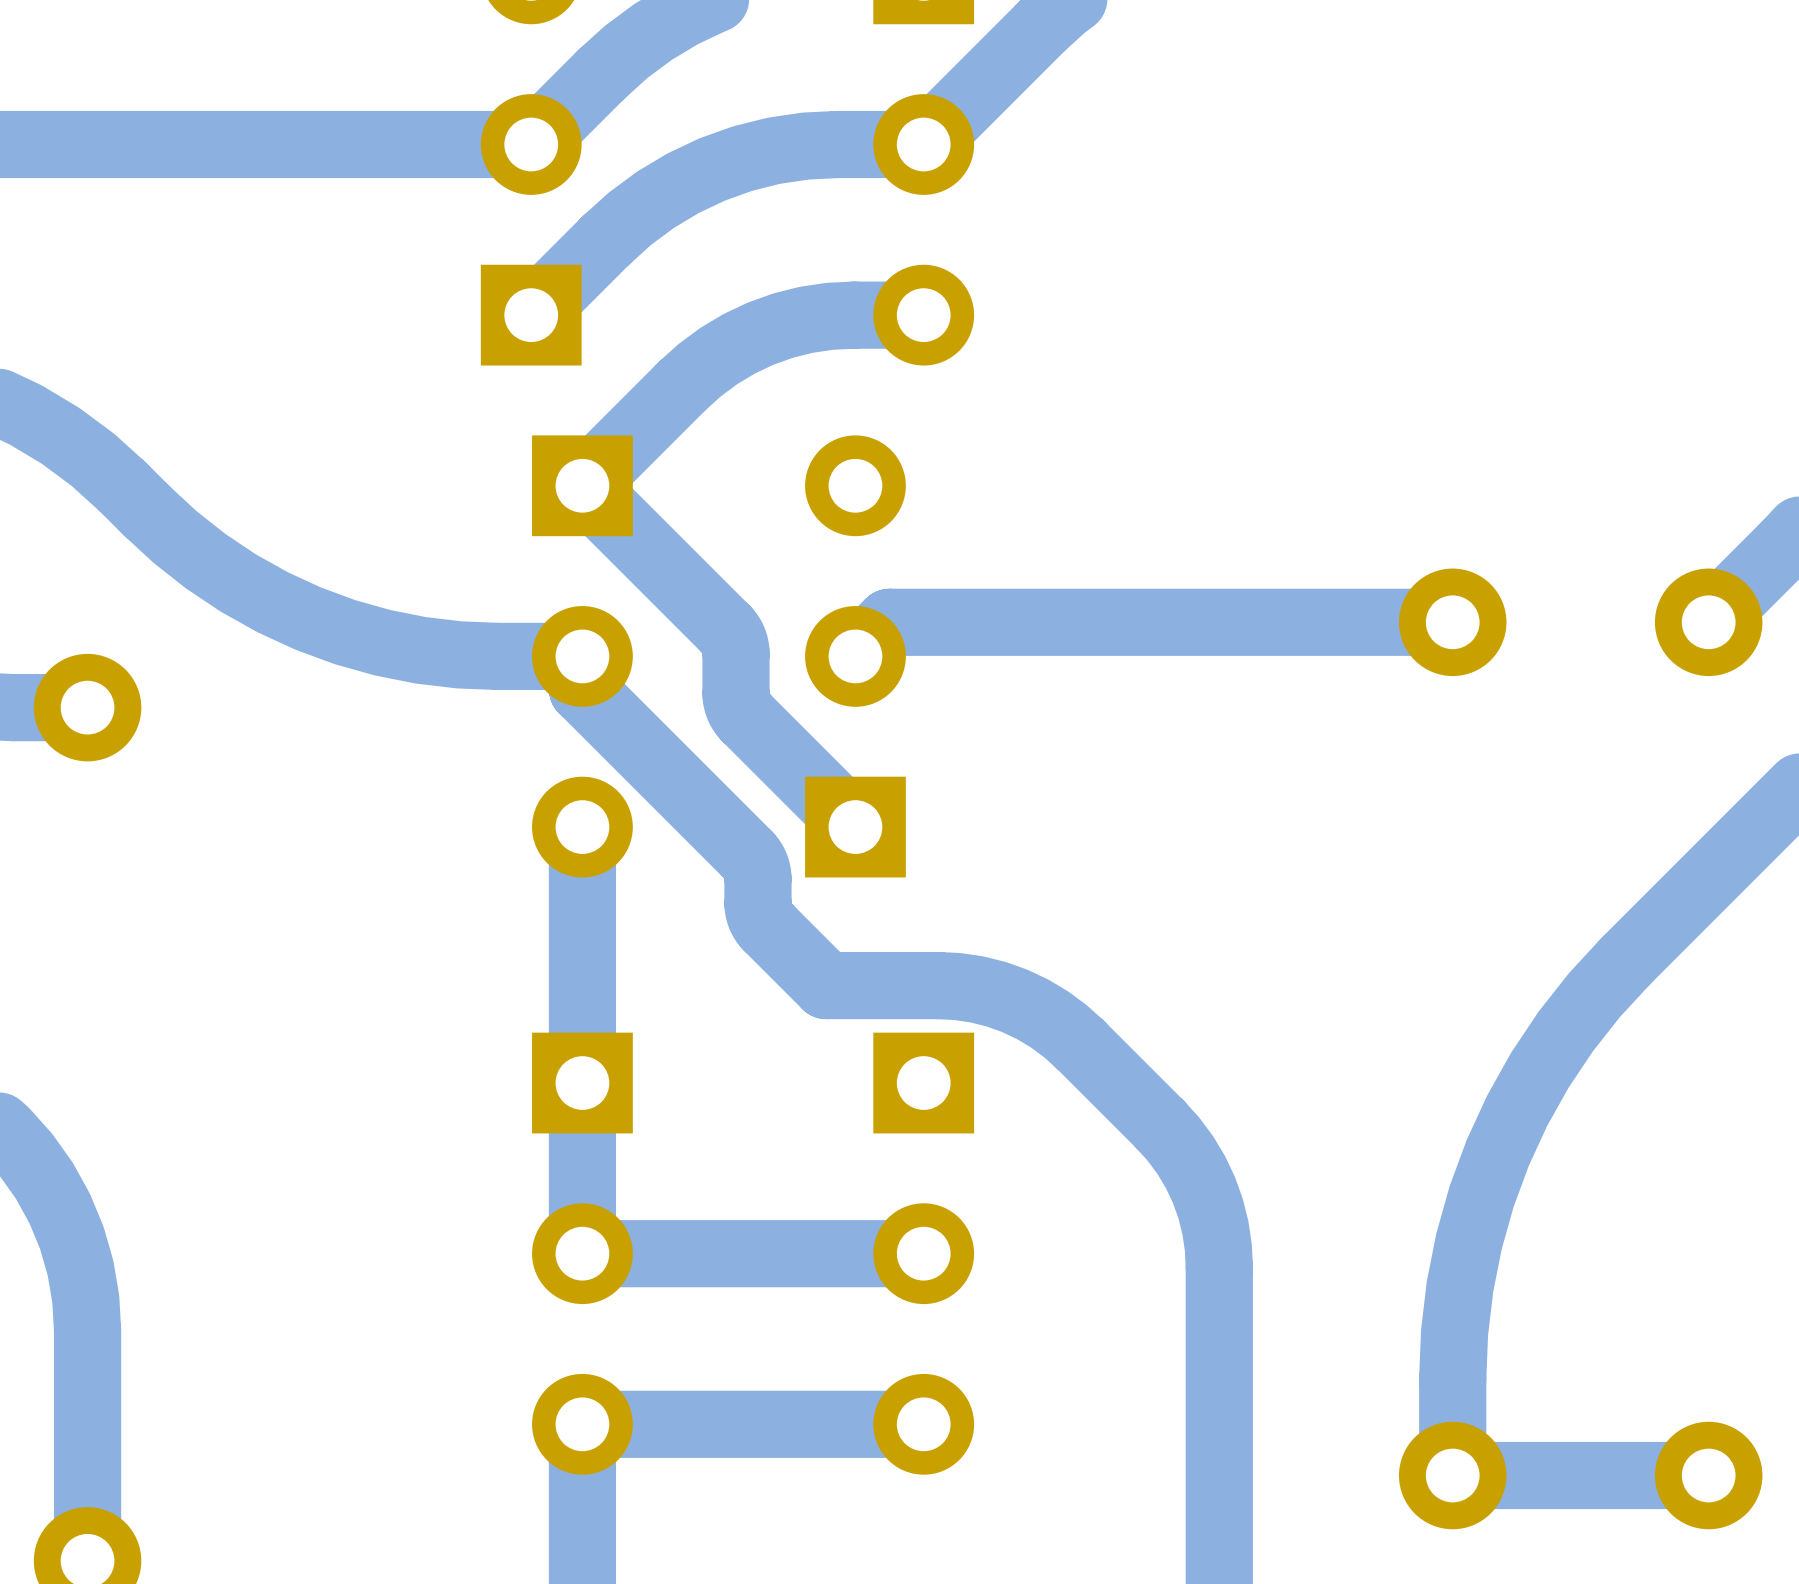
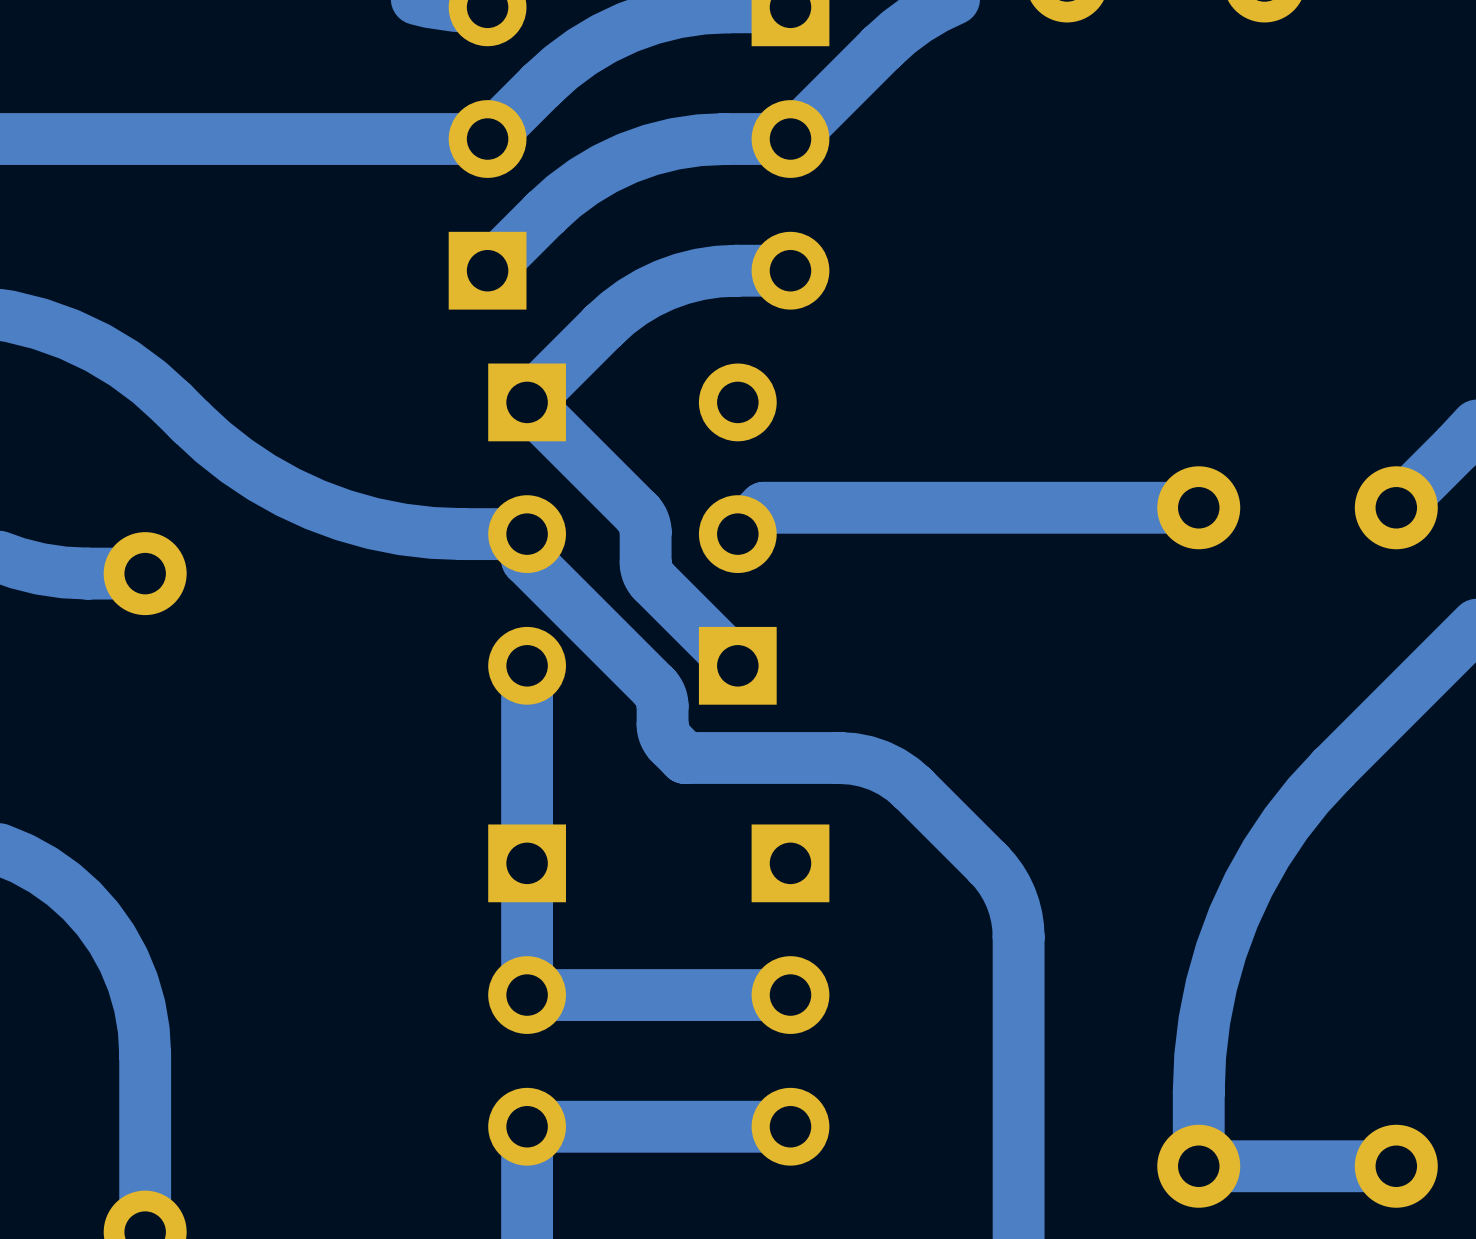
track: (787, 946) (826, 985) (937, 985) (977, 989) (996, 994) (1032, 1009) (1065, 1031) (1160, 1124) (1185, 1155) (1195, 1172) (1210, 1208) (1215, 1227) (1219, 1267) -> (685, 757) (853, 758) (879, 765) (902, 779) (988, 863) (1006, 888) (1014, 906) (1018, 926) (1018, 1005)

